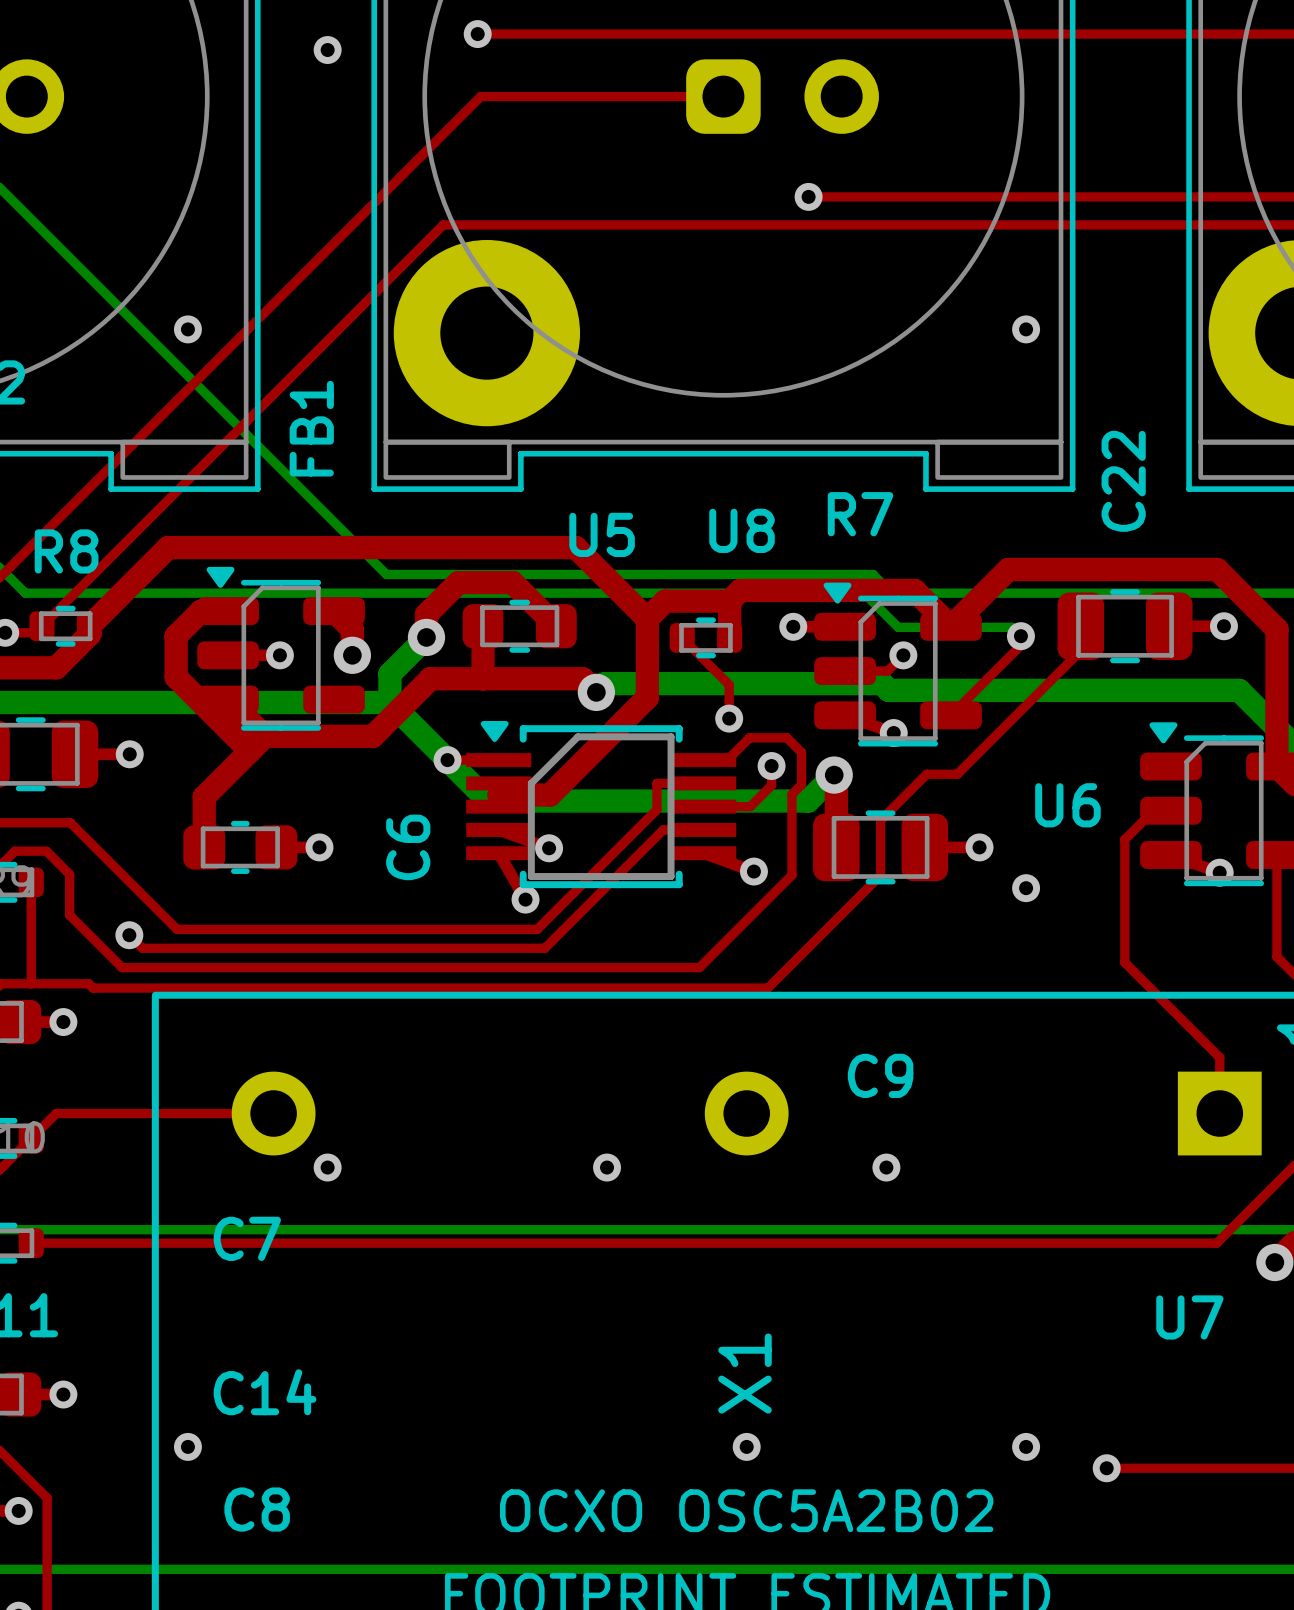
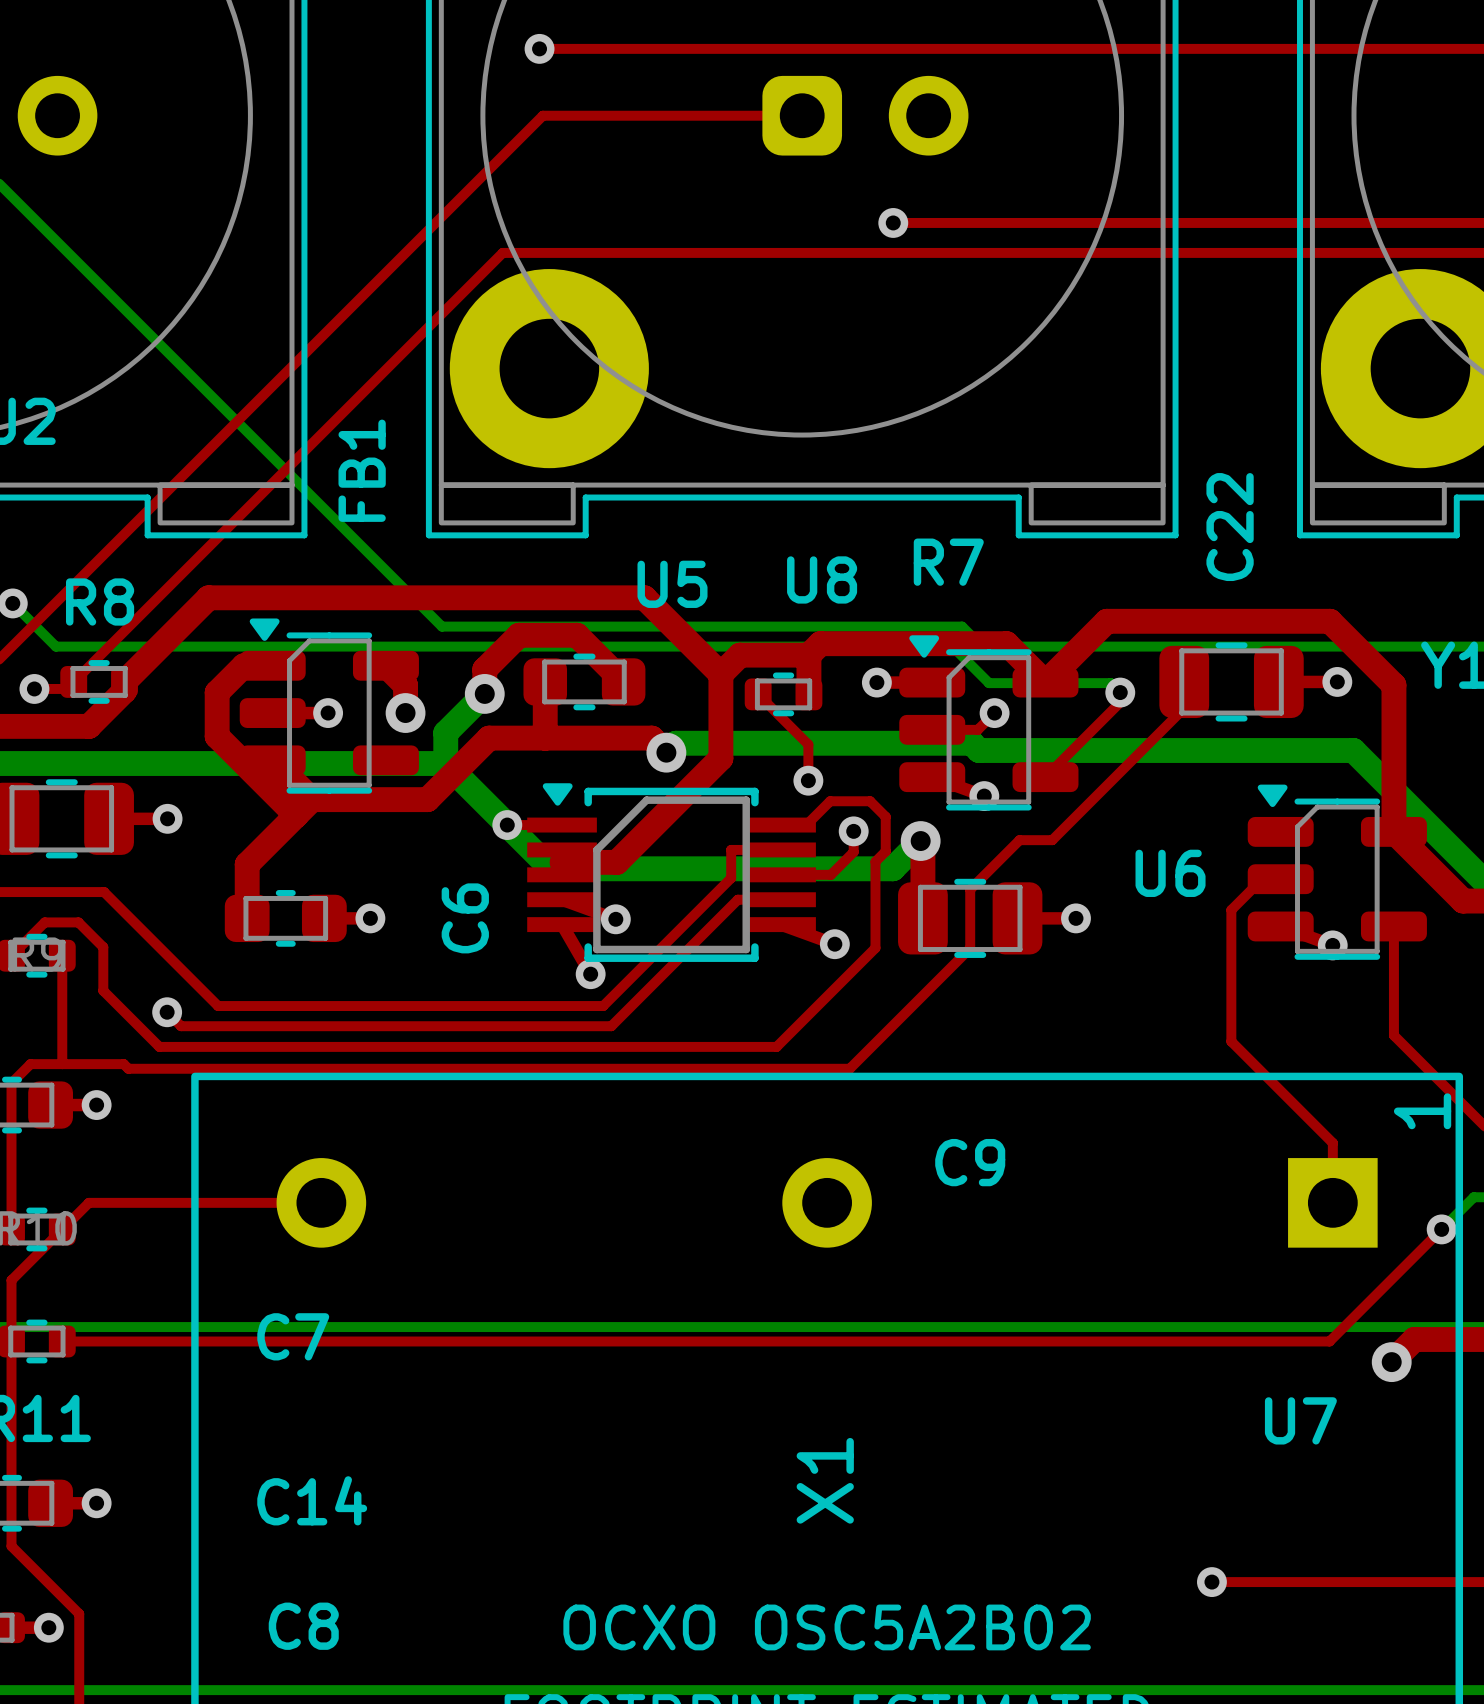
via: (327, 50) -> none
via: (187, 329) -> none
via: (1026, 329) -> none
via: (1026, 888) -> none
via: (327, 1167) -> none
via: (607, 1167) -> none
via: (886, 1167) -> none
via: (187, 1446) -> none
via: (746, 1446) -> none
via: (1026, 1446) -> none

